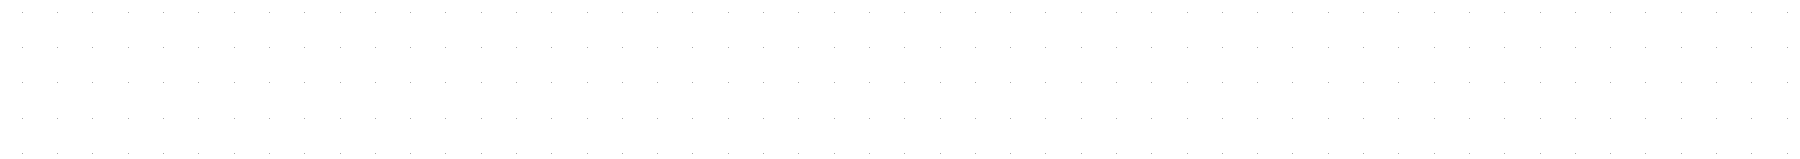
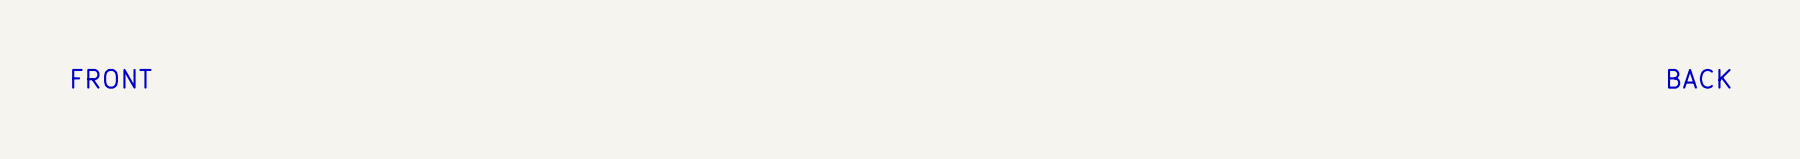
text: none -> FRONT (111, 78)
text: none -> BACK (1699, 78)

